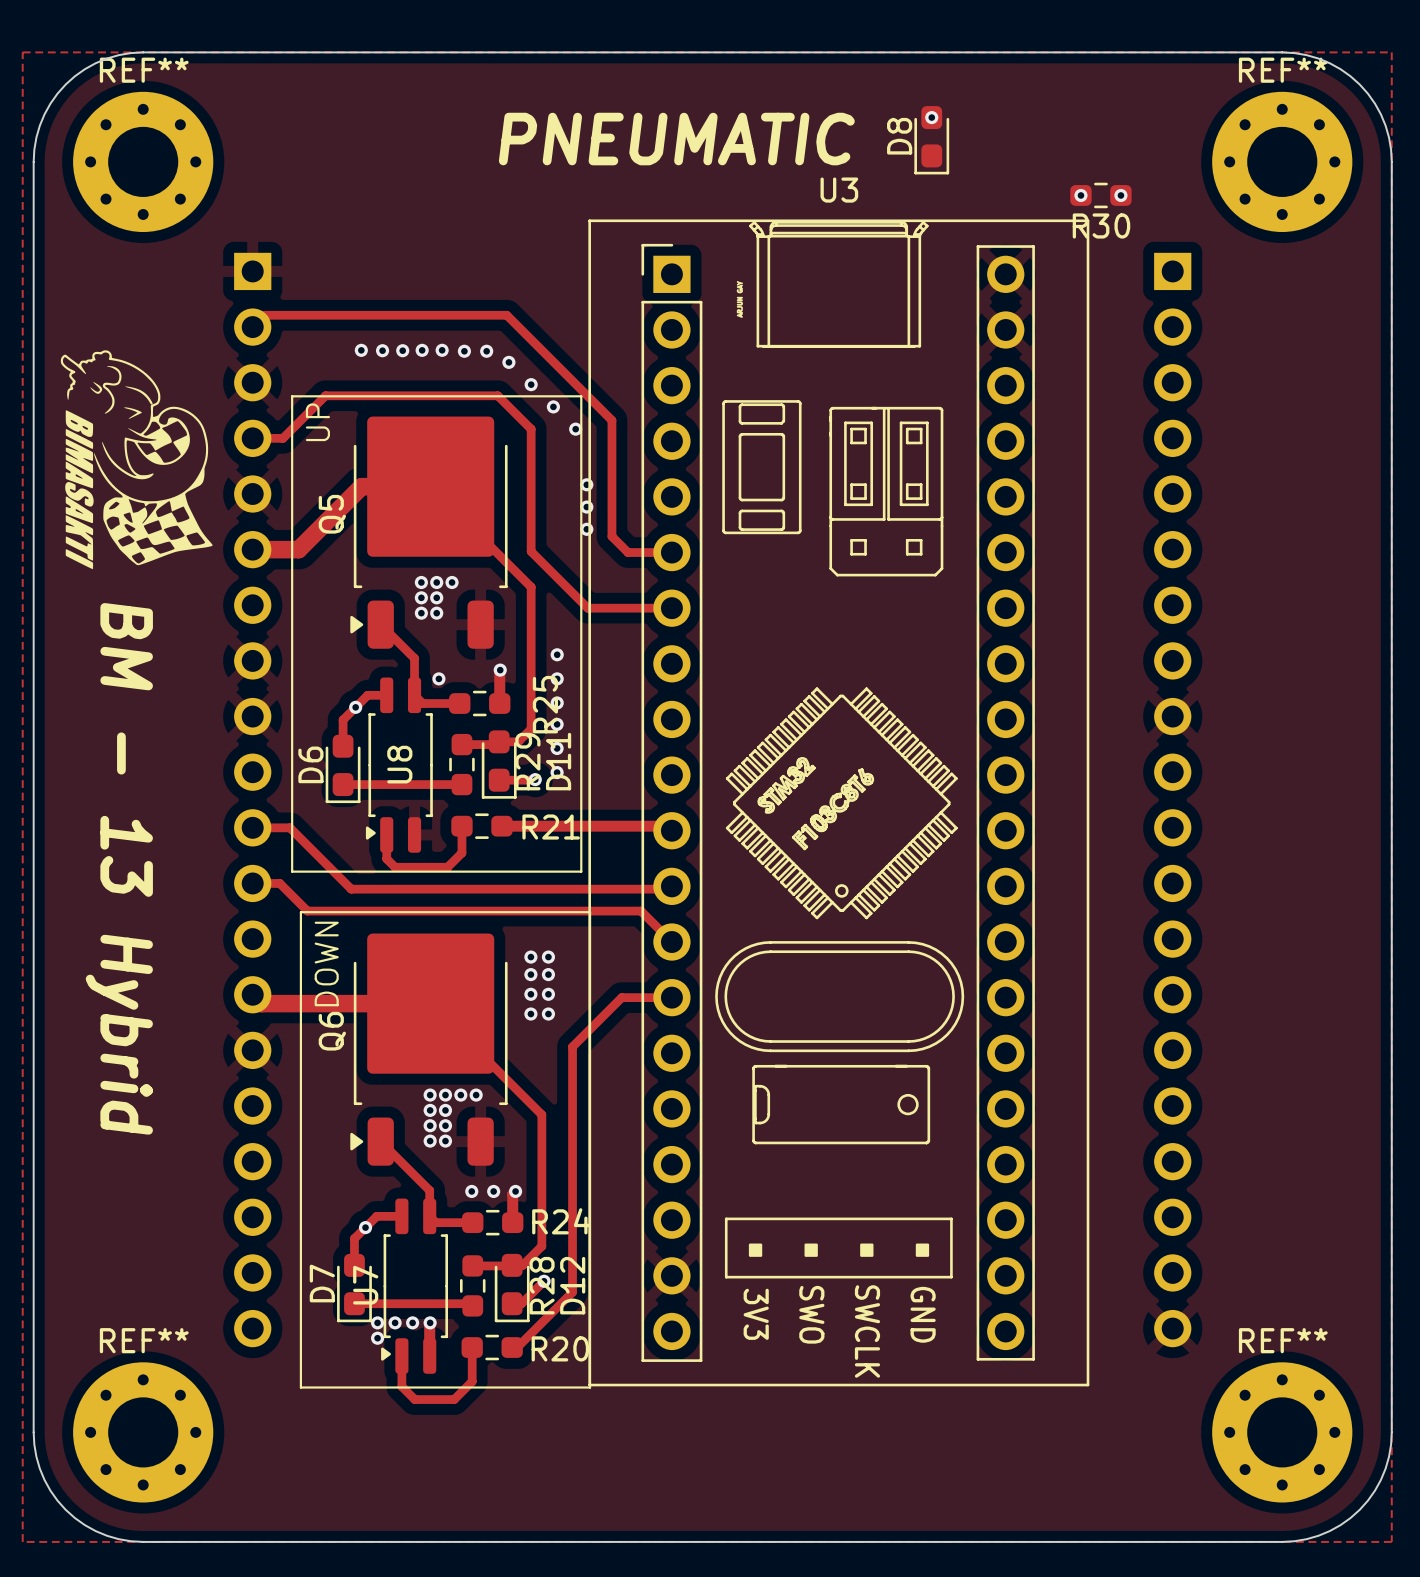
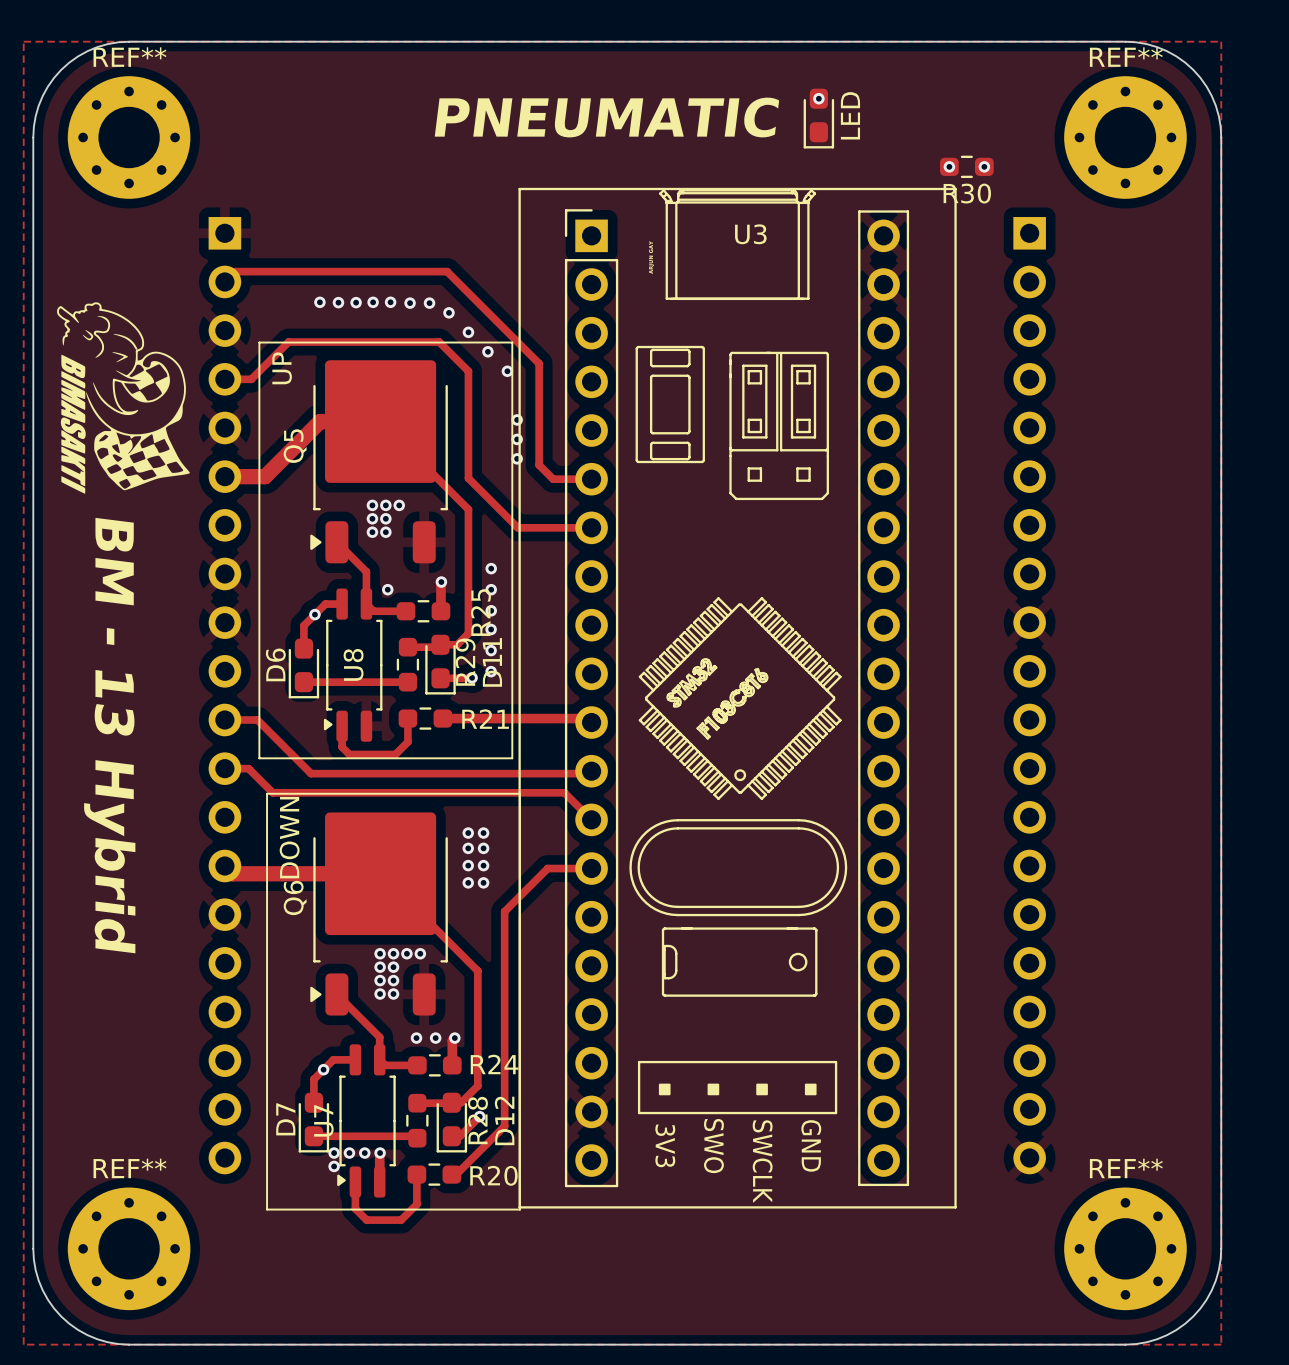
D8 name: D8 (899, 136) -> LED (850, 115)
U3 name position: U3 (839, 190) -> U3 (750, 234)

